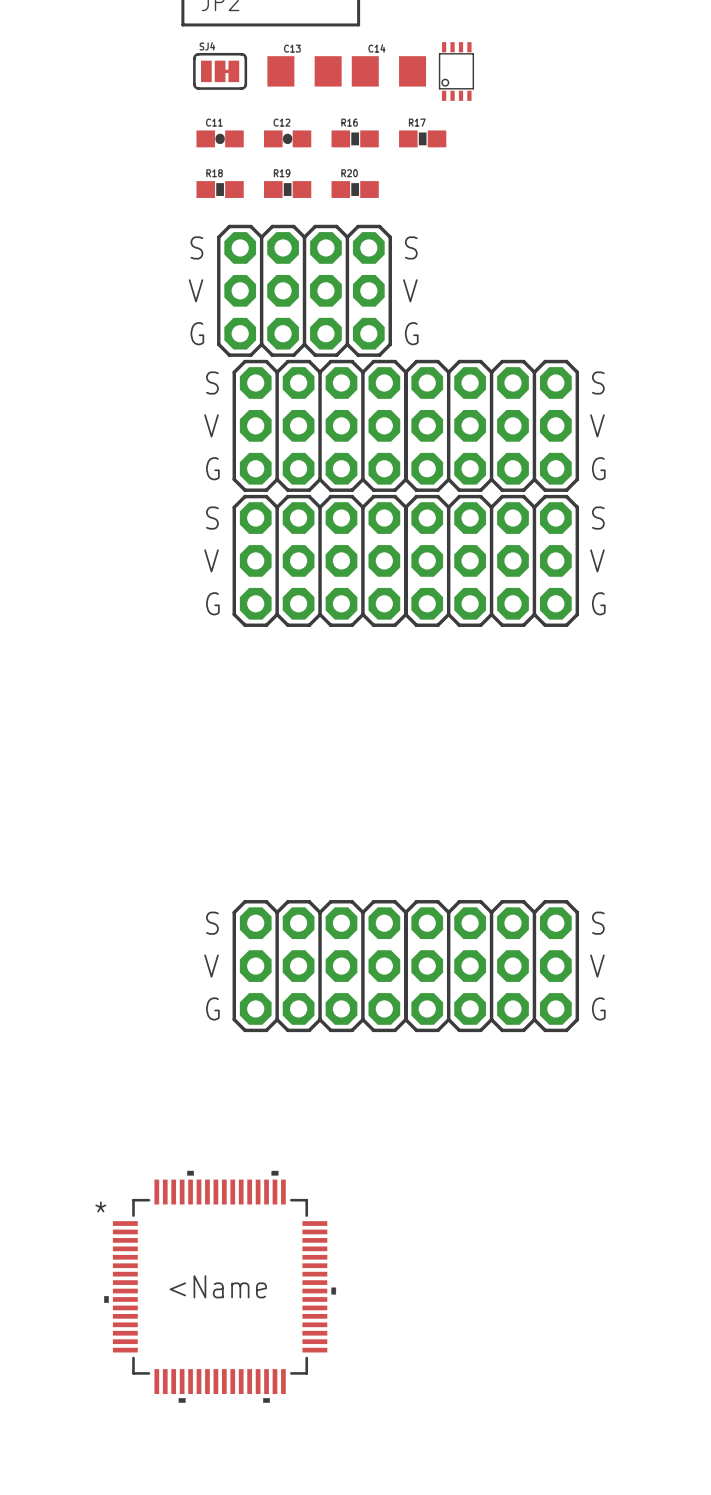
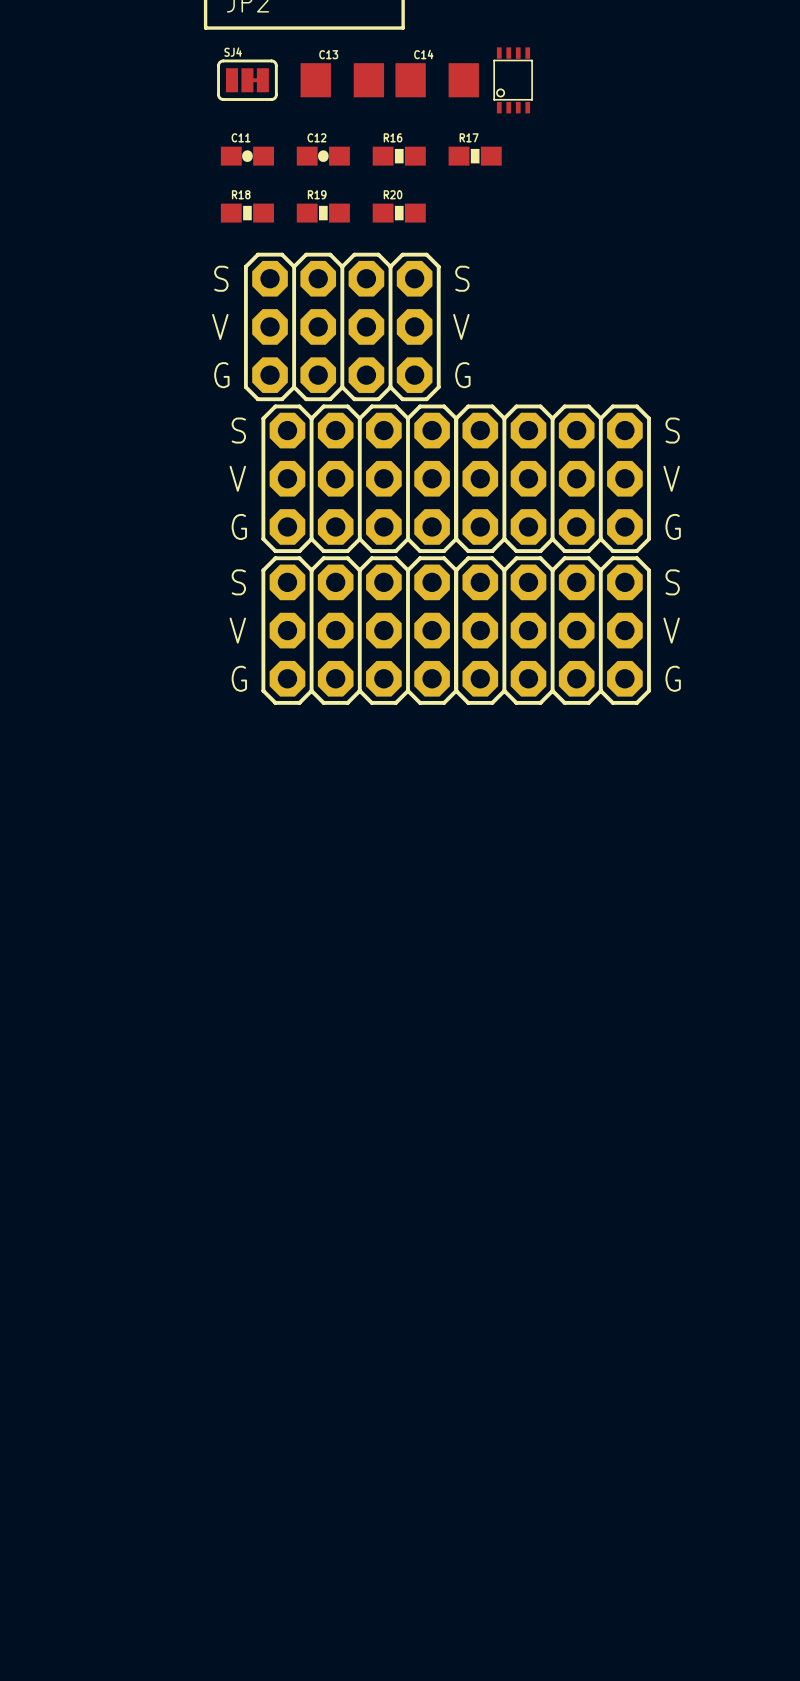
part: (405, 966) -> none
part: (220, 1286) -> none

